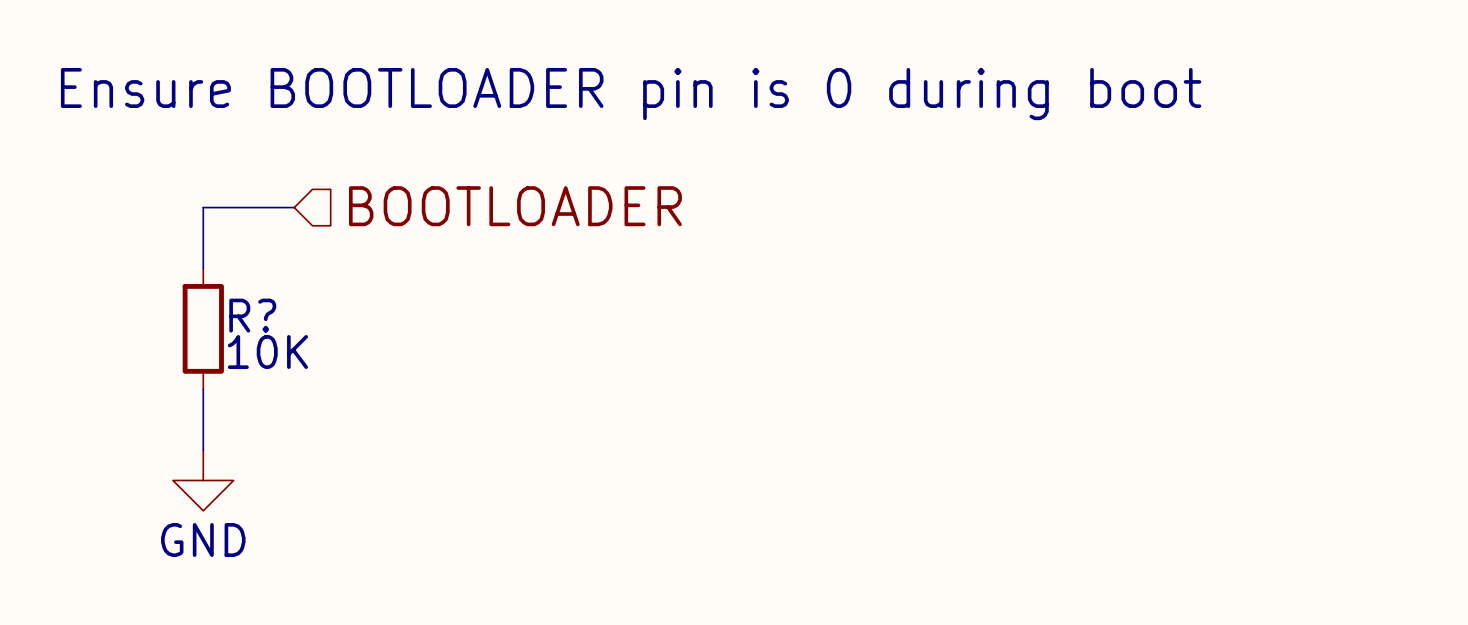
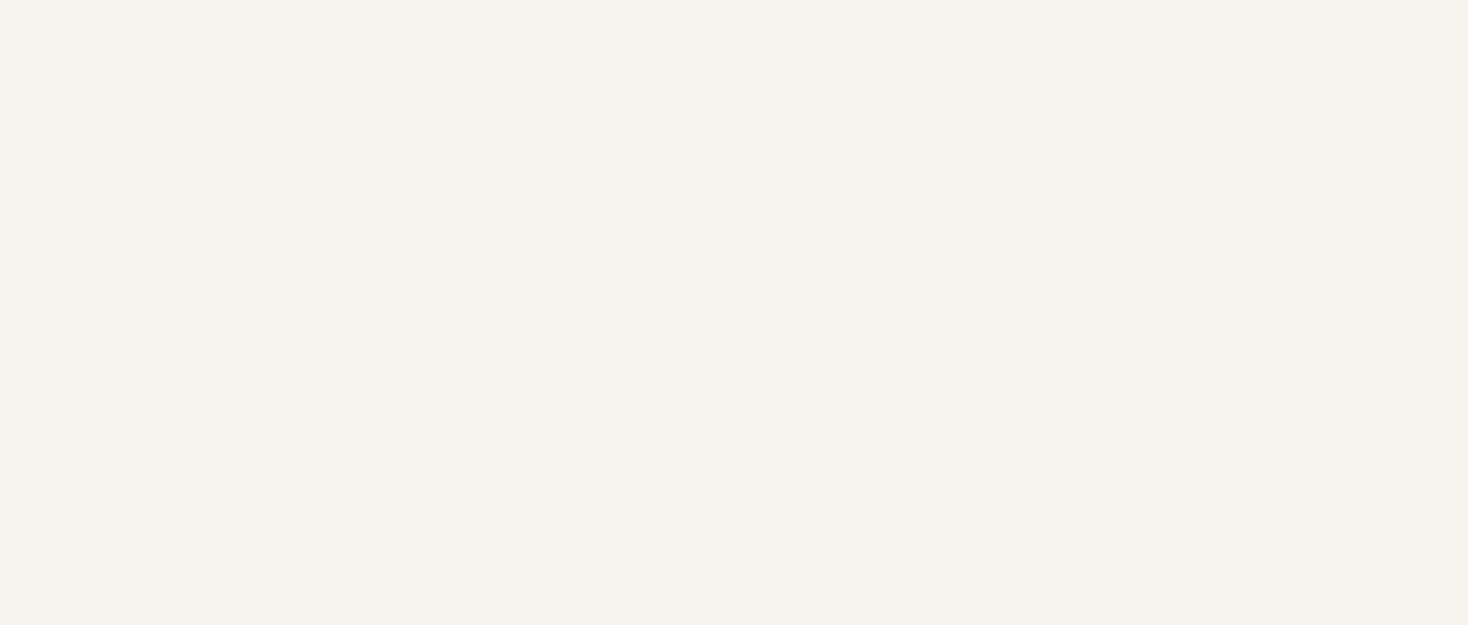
text: Ensure BOOTLOADER pin is 0 during boot (631, 94) -> none
hierarchical label: BOOTLOADER (515, 206) -> none
wire: (294, 207) (203, 207) (203, 268) -> none
R?: 10K (203, 328) -> none
wire: (203, 389) (203, 450) -> none
power symbol: GND (203, 480) -> none

